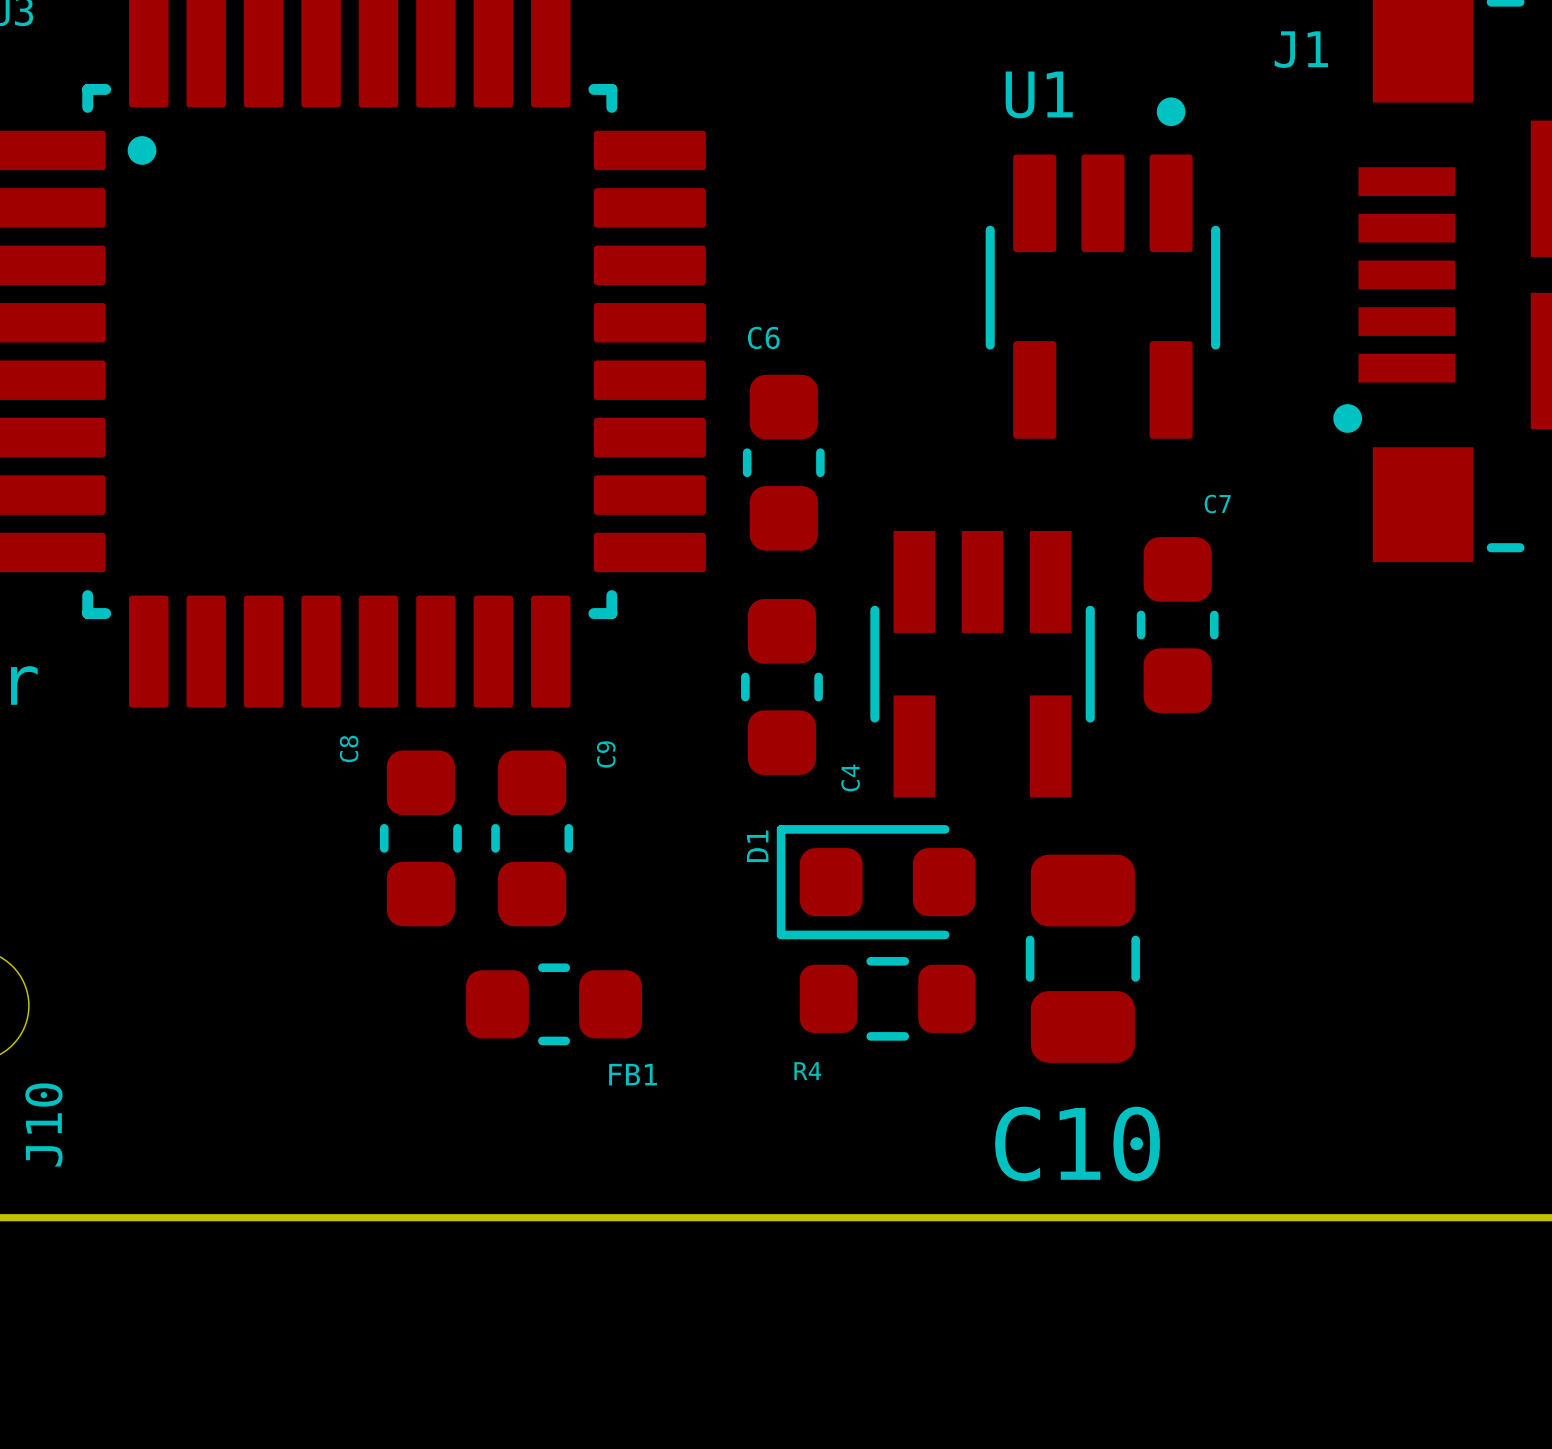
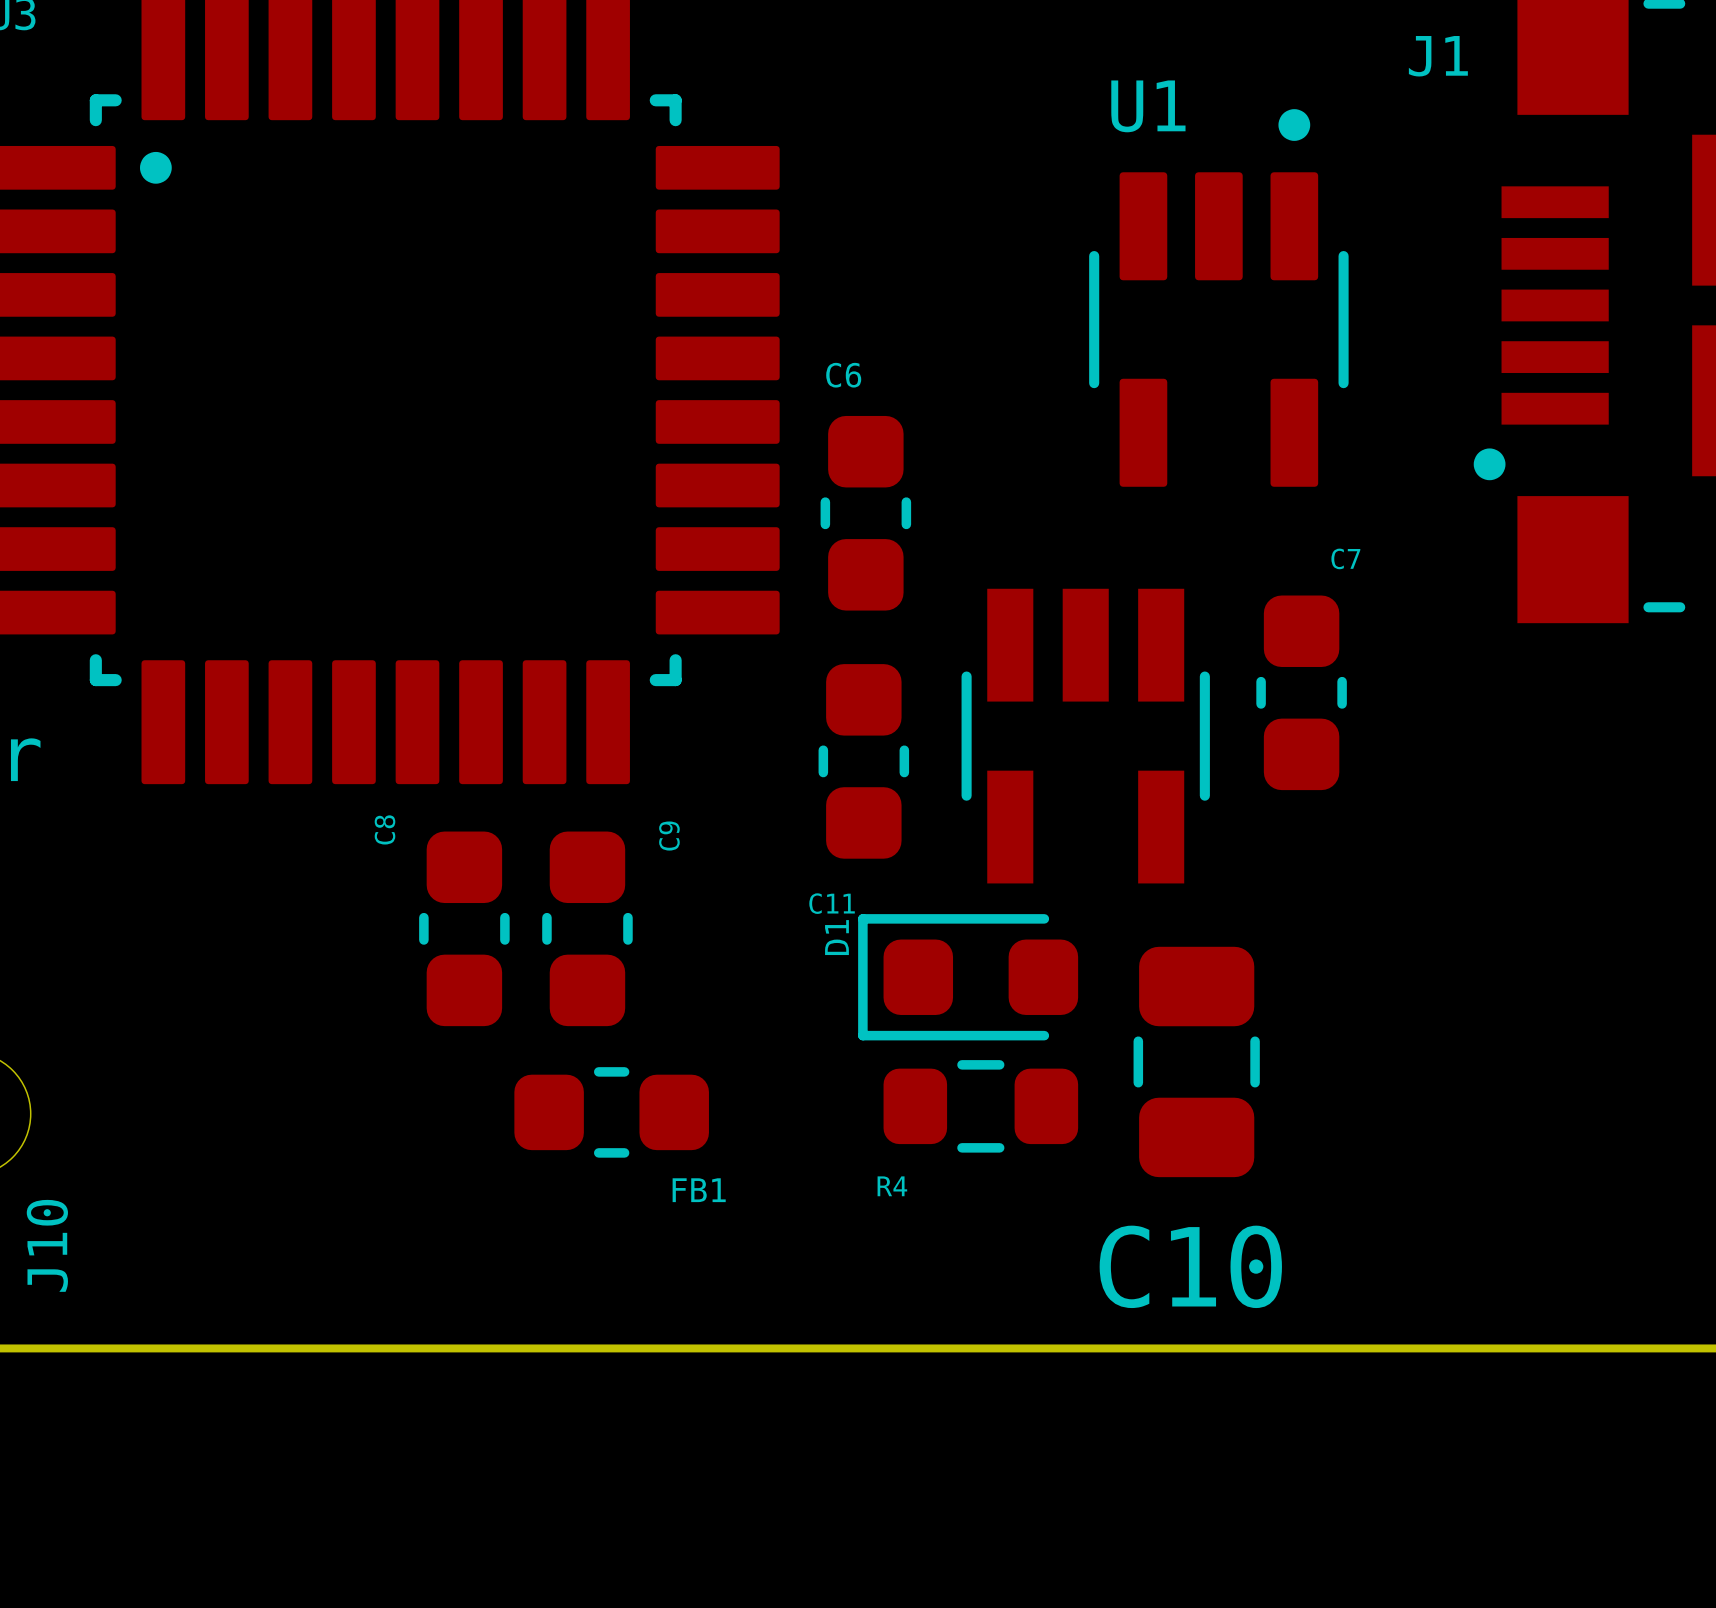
C4 name: C4 (850, 777) -> C11 (832, 903)

